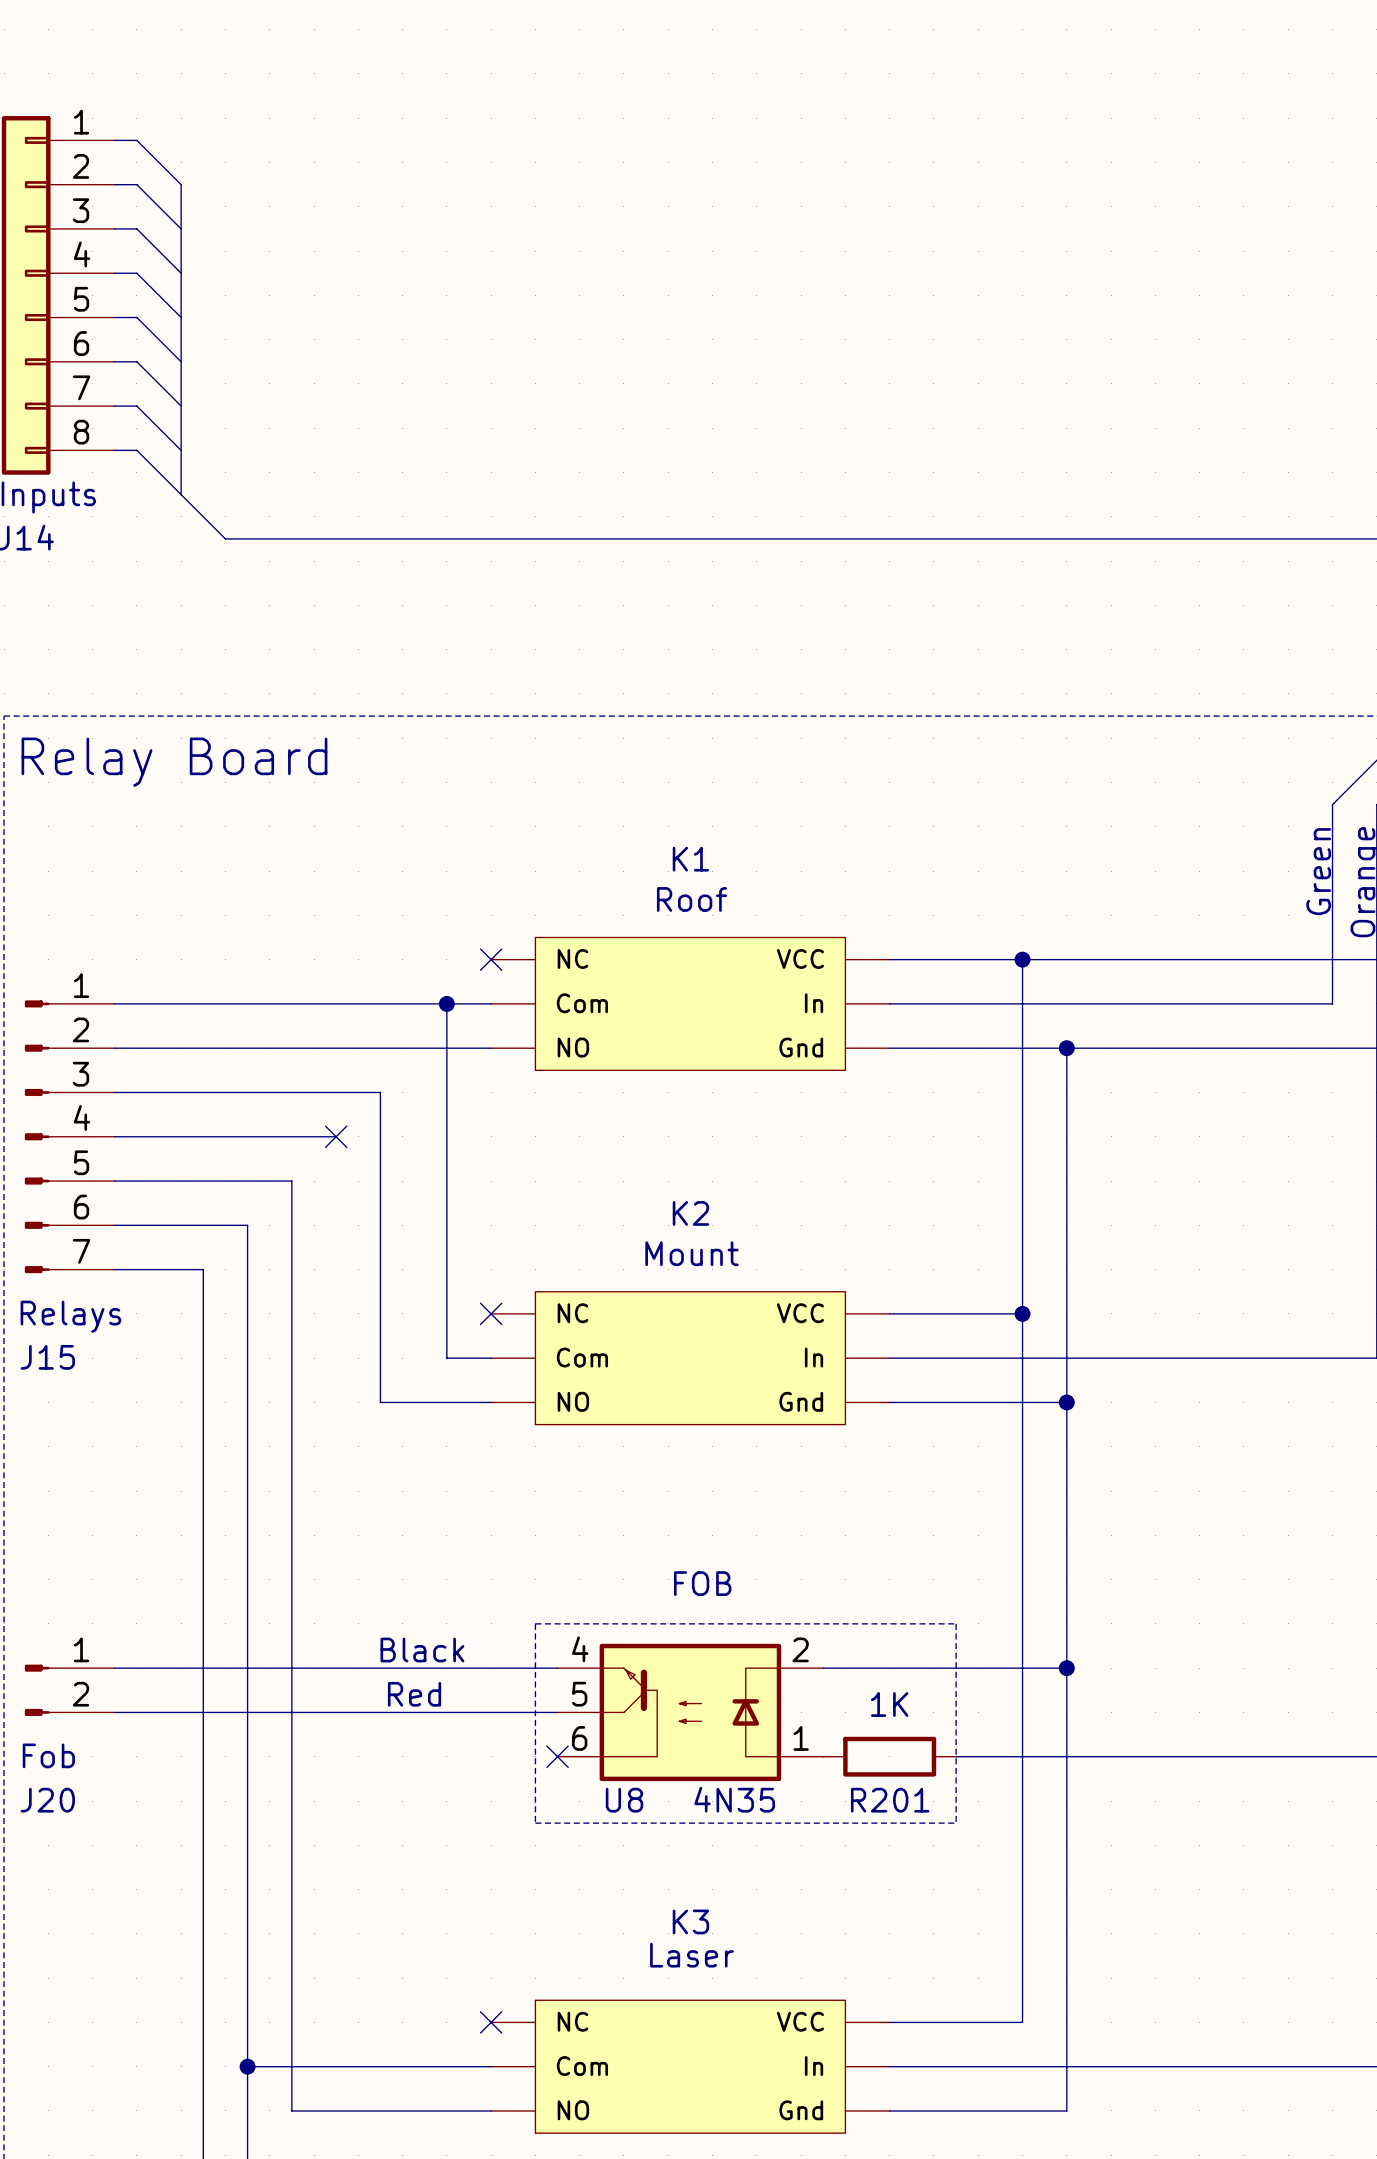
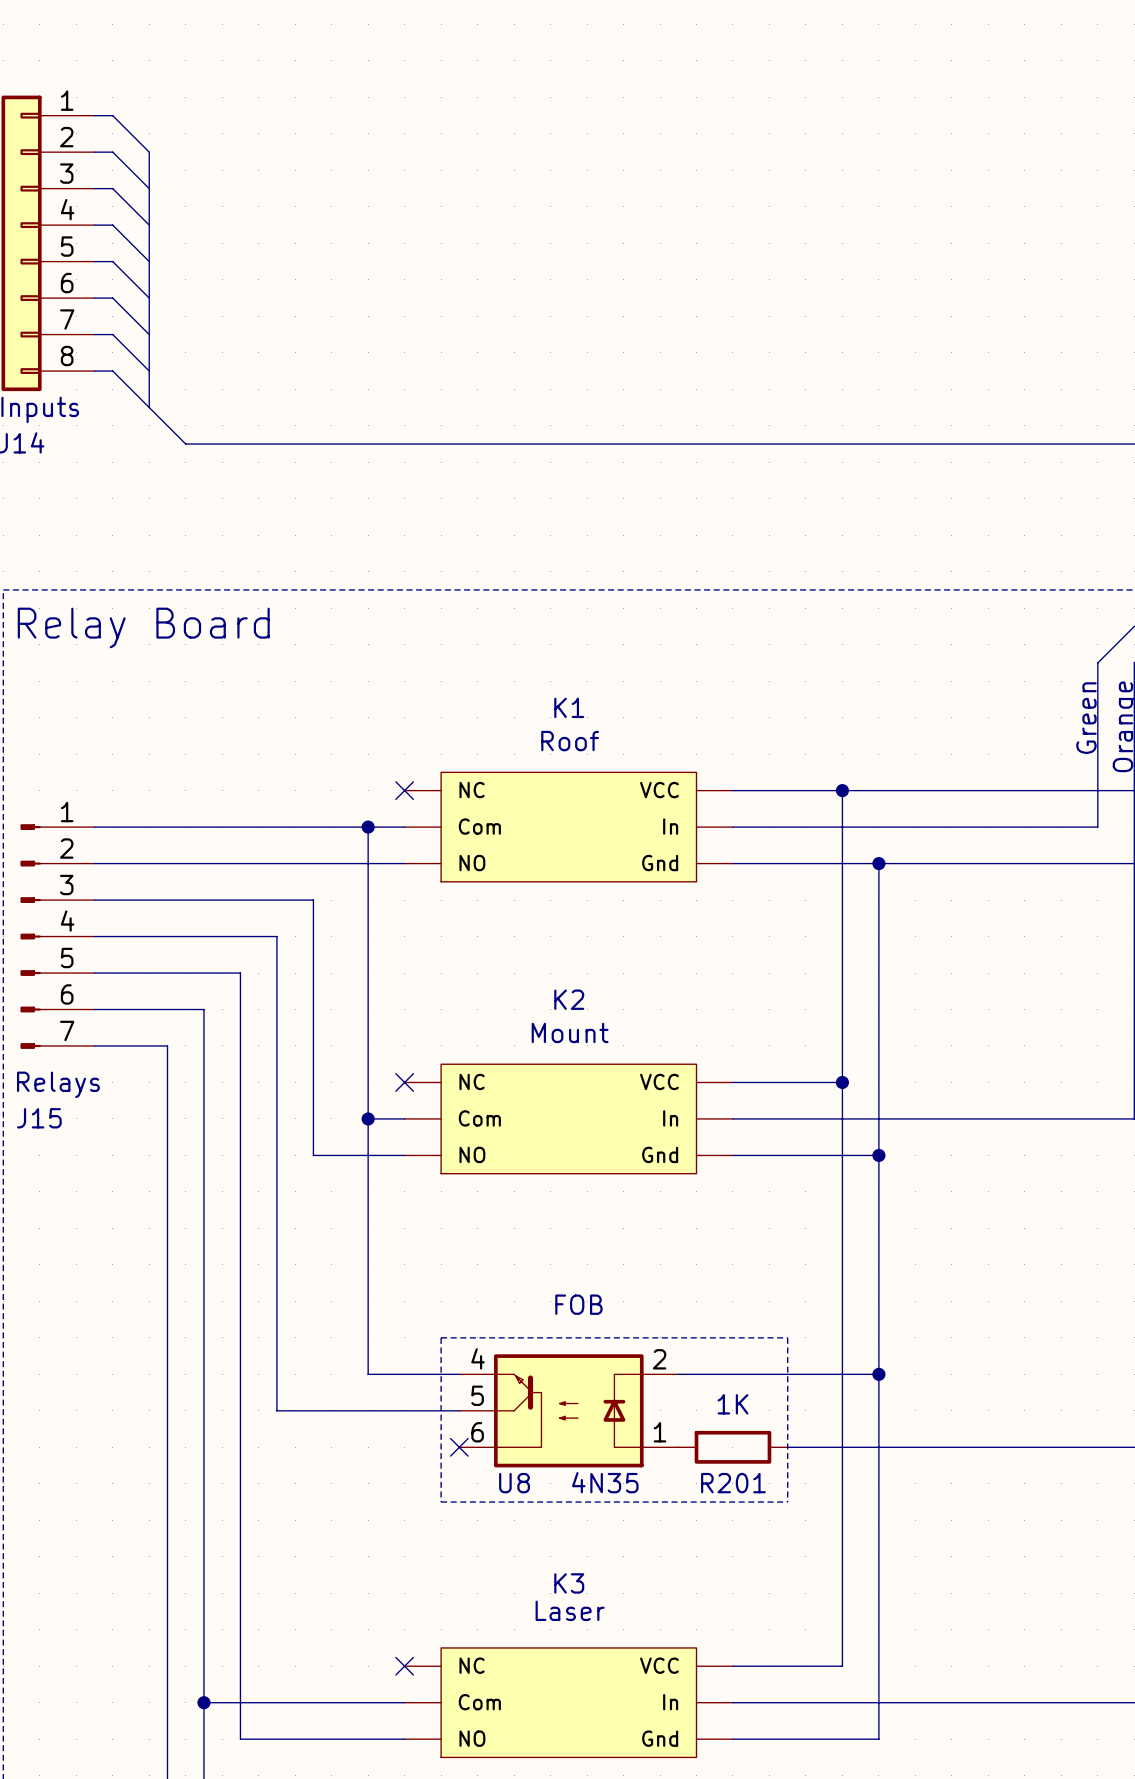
no-connect mark: (336, 1136) -> none
junction: none -> (368, 1118)
text: Black (422, 1650) -> none
wire: (114, 1668) (446, 1668) -> (368, 1118) (368, 1374)
J20: Fob (69, 1690) -> none
text: Red (414, 1694) -> none
wire: (114, 1712) (336, 1712) -> (276, 936) (276, 1410)

